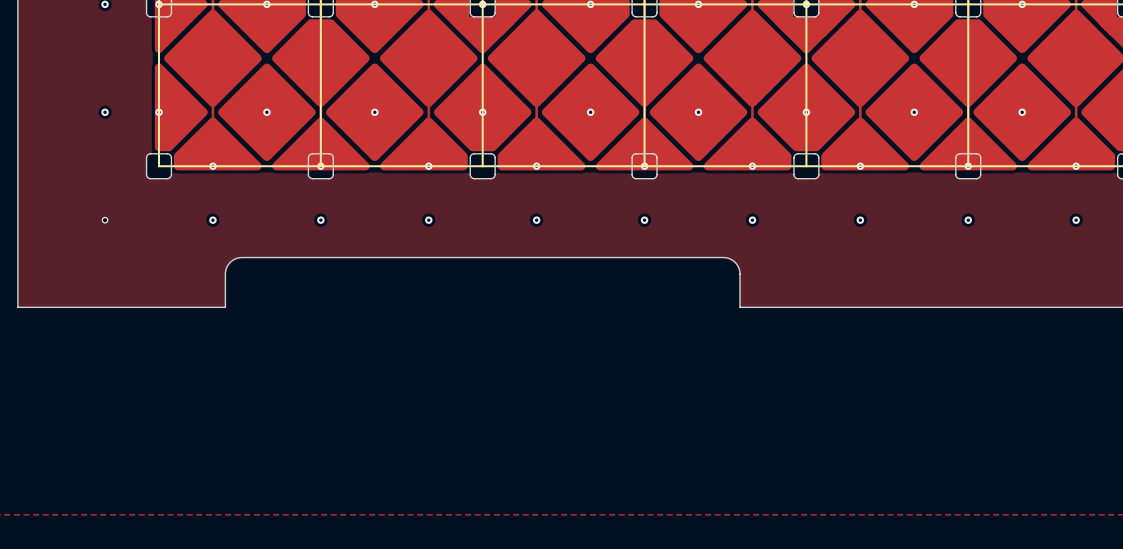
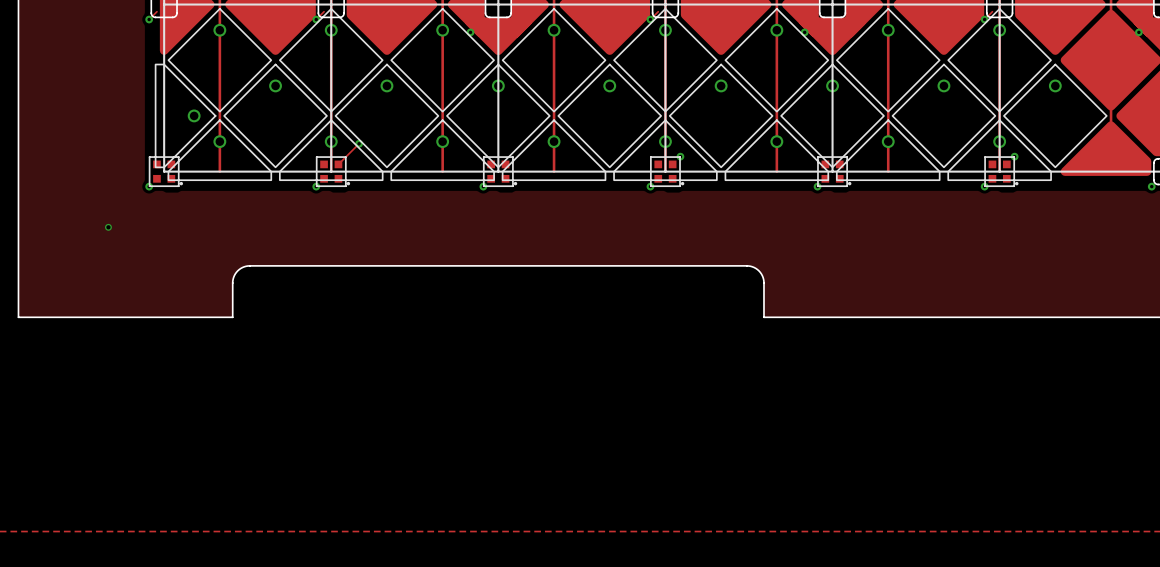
via: (105, 4) -> none
via: (159, 4) -> none
via: (266, 4) -> none
via: (374, 4) -> none
via: (482, 4) -> none
via: (590, 4) -> none
via: (698, 4) -> none
via: (806, 4) -> none
via: (914, 4) -> none
via: (1022, 4) -> none
part footprint: [164, 9, 262, 108] -> [168, 8, 272, 113]
part footprint: [379, 9, 478, 108] -> [390, 8, 495, 113]
part footprint: [487, 9, 586, 108] -> [502, 8, 606, 113]
part footprint: [703, 9, 802, 108] -> [725, 8, 829, 113]
part footprint: [811, 9, 910, 108] -> [836, 8, 941, 113]
track: none -> (156, 11) (149, 19)
track: none -> (324, 11) (316, 19)
track: none -> (658, 11) (650, 19)
track: none -> (992, 11) (984, 19)
via: none -> (149, 19)
via: none -> (316, 19)
via: none -> (650, 19)
via: none -> (984, 19)
part footprint: [272, 19, 370, 108] -> [279, 8, 384, 113]
part footprint: [595, 19, 694, 108] -> [613, 8, 718, 113]
part footprint: [919, 19, 1018, 108] -> [947, 8, 1052, 113]
via: none -> (470, 32)
via: none -> (804, 32)
via: none -> (1138, 32)
part footprint: [154, 63, 208, 152] -> [154, 63, 217, 169]
part footprint: [218, 63, 316, 162] -> [223, 64, 328, 168]
part footprint: [326, 63, 424, 162] -> [335, 64, 439, 168]
part footprint: [433, 63, 532, 152] -> [446, 64, 551, 168]
part footprint: [541, 63, 640, 162] -> [557, 64, 662, 168]
part footprint: [649, 63, 748, 162] -> [669, 64, 773, 168]
part footprint: [757, 63, 856, 152] -> [780, 64, 885, 168]
part footprint: [865, 63, 964, 162] -> [892, 64, 996, 168]
part footprint: [973, 63, 1071, 162] -> [1003, 64, 1108, 168]
via: (105, 112) -> none
via: (159, 112) -> none
via: (266, 112) -> none
via: (374, 112) -> none
via: (482, 112) -> none
via: (590, 112) -> none
via: (698, 112) -> none
via: (806, 112) -> none
via: (914, 112) -> none
via: (1022, 112) -> none
part footprint: [173, 117, 262, 171] -> [167, 119, 273, 182]
part footprint: [272, 117, 370, 171] -> [278, 119, 384, 182]
part footprint: [380, 117, 468, 171] -> [390, 119, 495, 182]
part footprint: [497, 117, 586, 171] -> [501, 119, 607, 182]
part footprint: [595, 117, 694, 171] -> [613, 119, 718, 182]
part footprint: [703, 117, 792, 171] -> [724, 119, 830, 182]
part footprint: [821, 117, 910, 171] -> [835, 119, 941, 182]
part footprint: [919, 117, 1018, 171] -> [947, 119, 1052, 182]
track: none -> (359, 143) (338, 164)
via: none -> (359, 143)
via: none -> (680, 156)
via: none -> (1014, 156)
board edge: (150, 153) (170, 155) (169, 177) (147, 177) (146, 157) (150, 153) -> none
board edge: (312, 153) (332, 155) (331, 177) (309, 177) (308, 157) (312, 153) -> none
board edge: (474, 153) (494, 155) (493, 177) (471, 177) (470, 157) (474, 153) -> none
board edge: (636, 153) (656, 155) (655, 177) (633, 177) (632, 157) (636, 153) -> none
board edge: (798, 153) (817, 155) (817, 177) (794, 177) (793, 157) (798, 153) -> none
board edge: (959, 153) (979, 155) (979, 177) (956, 177) (955, 157) (959, 153) -> none
part: none -> (165, 171)
via: (212, 166) -> none
via: (320, 166) -> none
part: none -> (332, 171)
via: (428, 166) -> none
part: none -> (500, 171)
via: (536, 166) -> none
via: (644, 166) -> none
part: none -> (667, 171)
via: (752, 166) -> none
part: none -> (834, 171)
via: (860, 166) -> none
via: (968, 166) -> none
part: none -> (1001, 171)
via: (1076, 166) -> none
via: none -> (149, 186)
via: none -> (316, 186)
via: none -> (483, 186)
via: none -> (650, 186)
via: none -> (817, 186)
via: none -> (984, 186)
via: none -> (1151, 186)
via: (212, 220) -> none
via: (320, 220) -> none
via: (428, 220) -> none
via: (536, 220) -> none
via: (644, 220) -> none
via: (752, 220) -> none
via: (860, 220) -> none
via: (968, 220) -> none
via: (1076, 220) -> none

